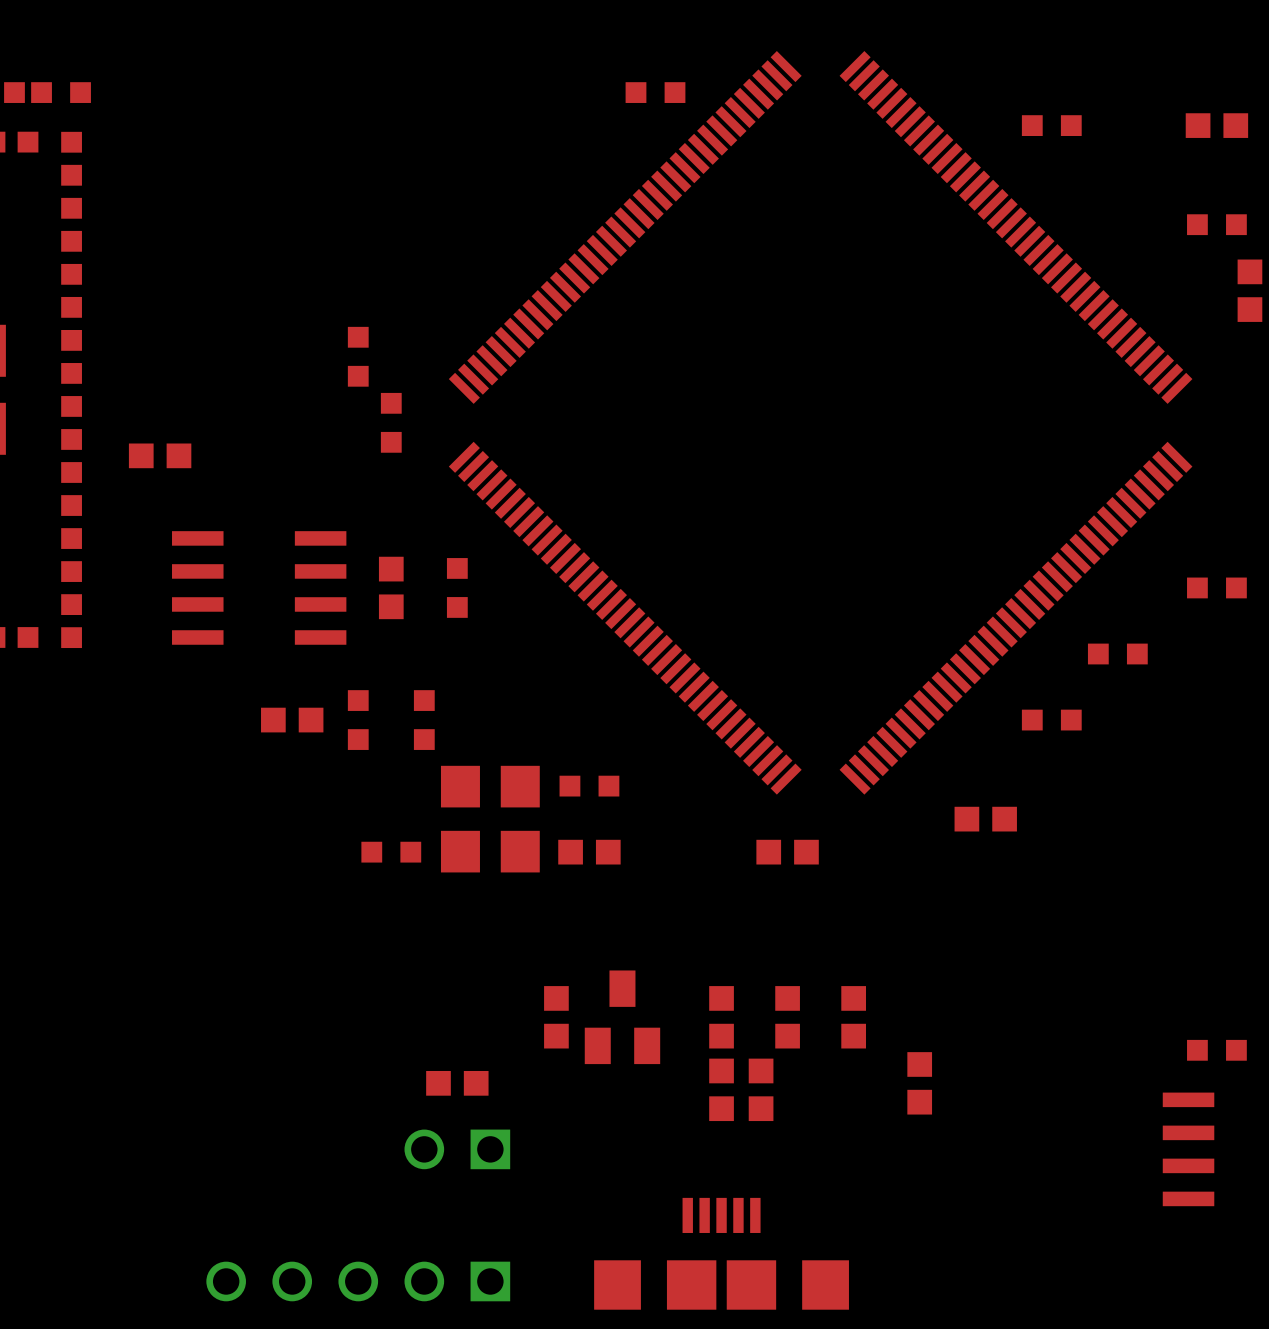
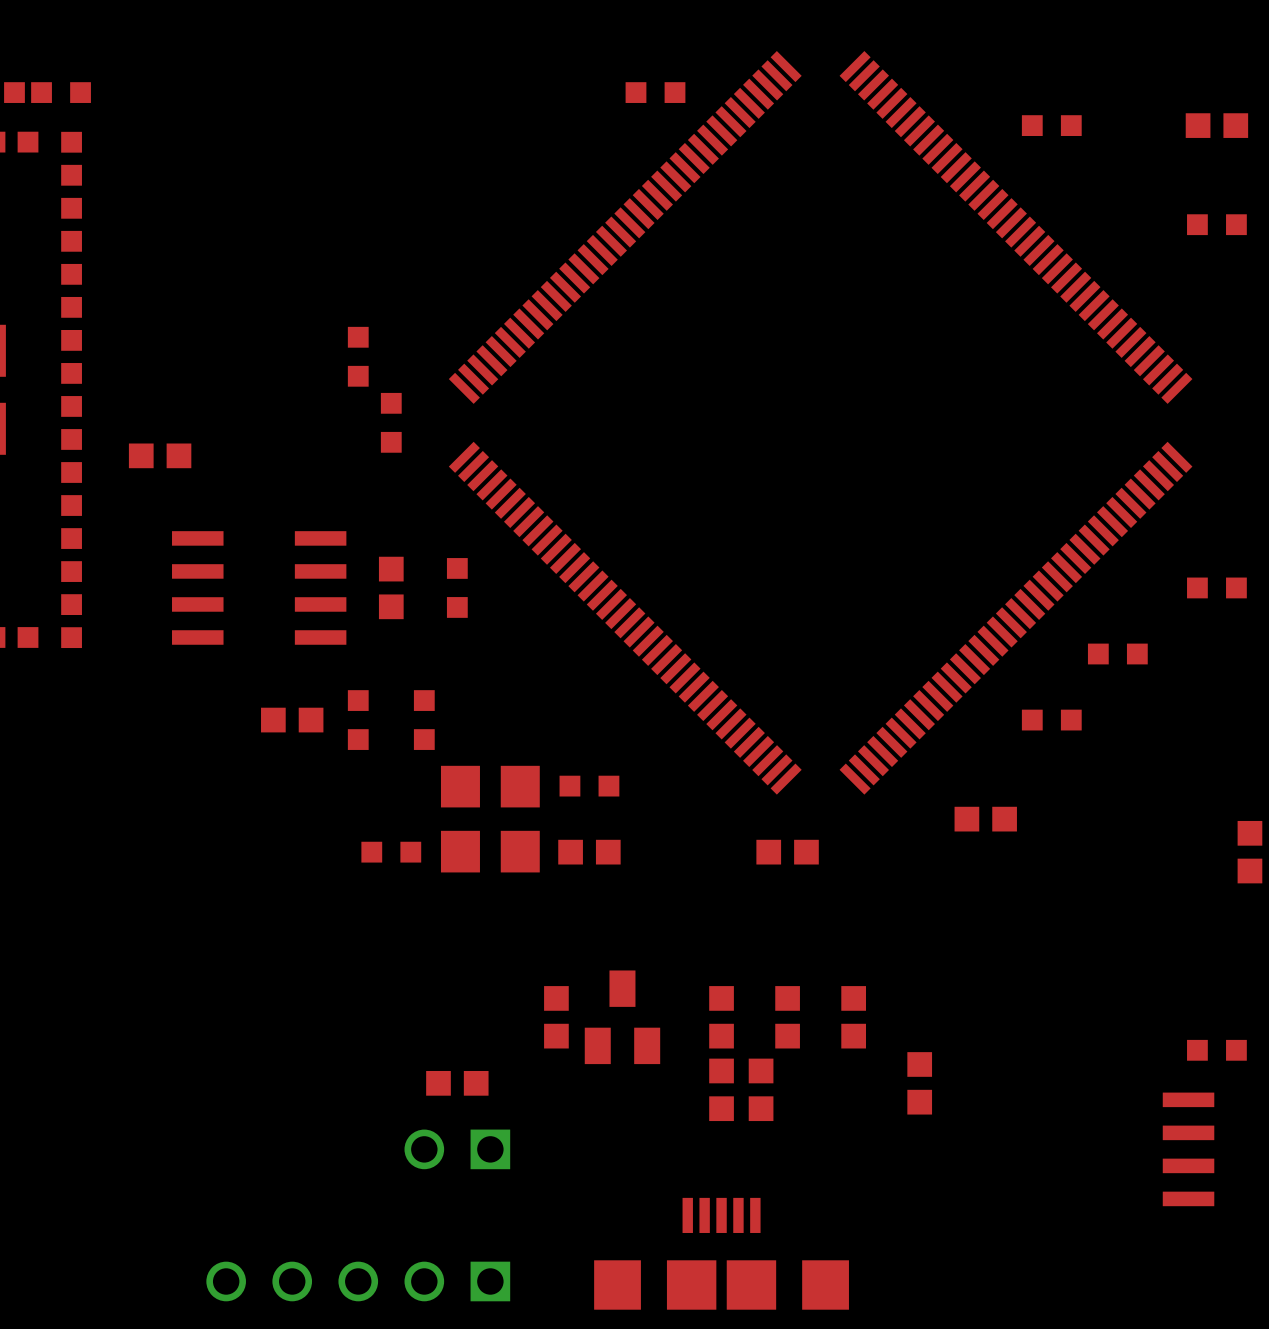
part position: (1249, 290) -> (1249, 852)

